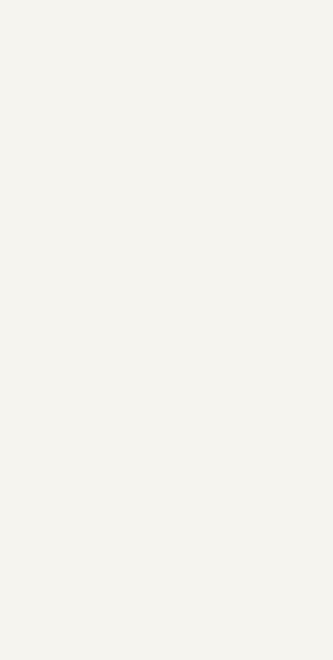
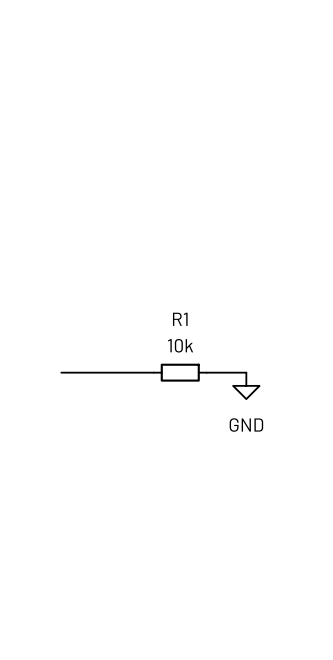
wire: none -> (61, 372) (153, 372)
R1: none -> 10k (180, 372)
wire: none -> (206, 372) (246, 372)
power symbol: none -> GND (246, 385)

